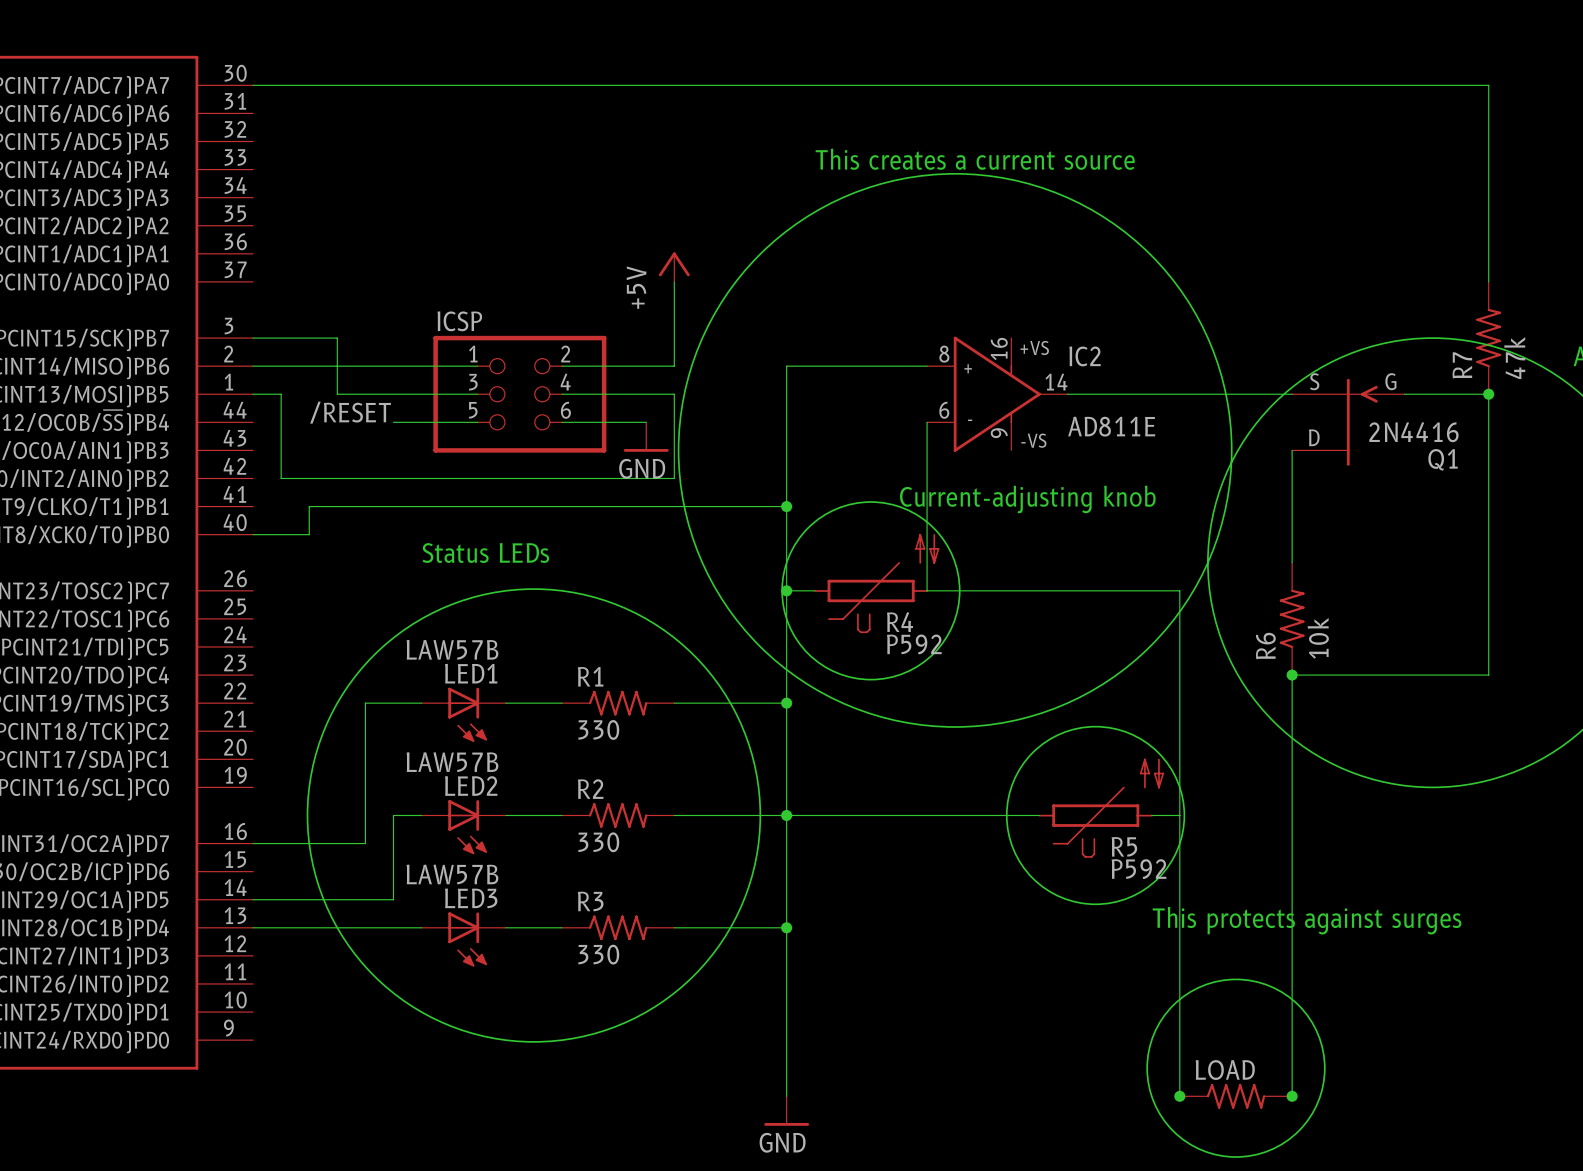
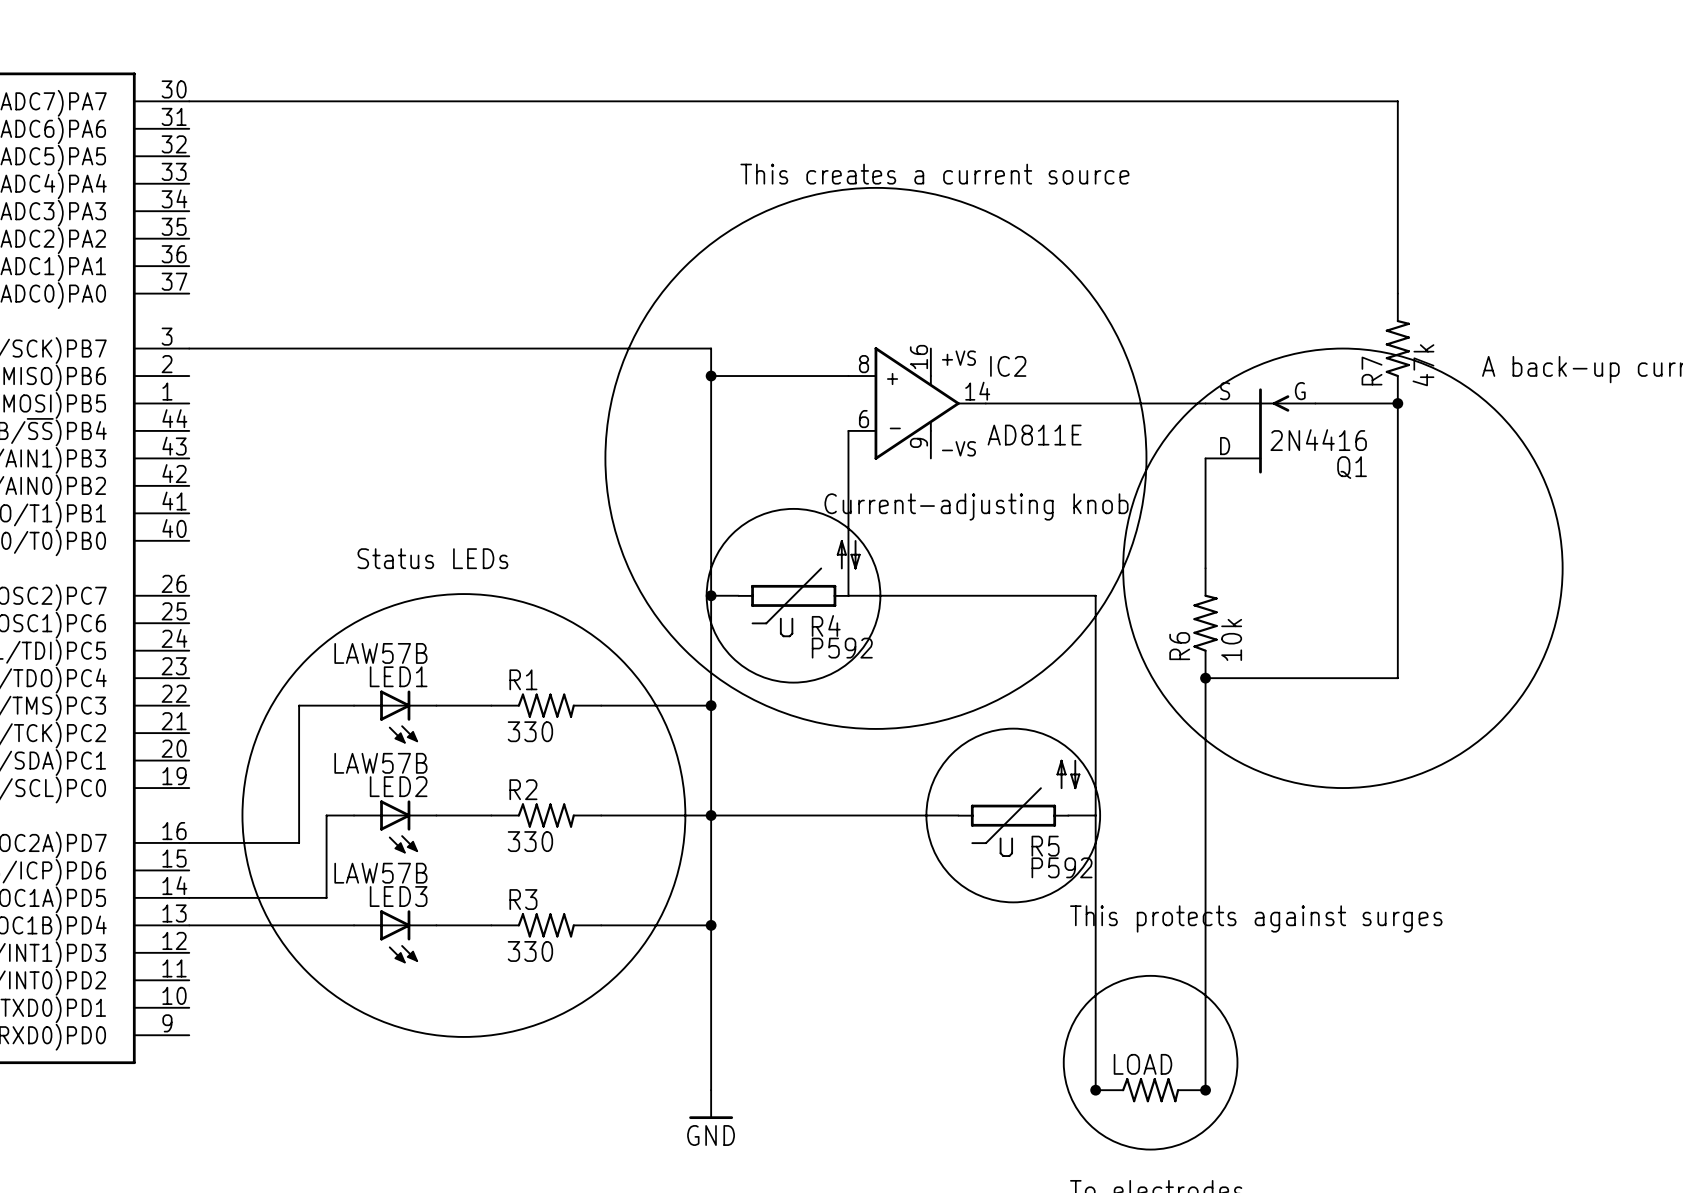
power symbol: +5V (674, 267) -> none
wire: (674, 281) (674, 366) (561, 366) -> none
wire: (337, 338) (337, 394) (477, 394) -> (271, 348) (711, 348) (711, 376)
wire: (253, 366) (477, 366) -> none
junction: none -> (711, 376)
wire: (253, 394) (281, 394) (281, 478) (674, 478) (674, 394) (561, 394) -> none
ICSP: (519, 394) -> none
label: /RESET (350, 412) -> none
wire: (393, 422) (477, 422) -> none
wire: (561, 422) (646, 422) -> none
power symbol: GND (646, 437) -> none
wire: (786, 506) (309, 506) (309, 534) (253, 534) -> none
junction: (786, 506) -> none

